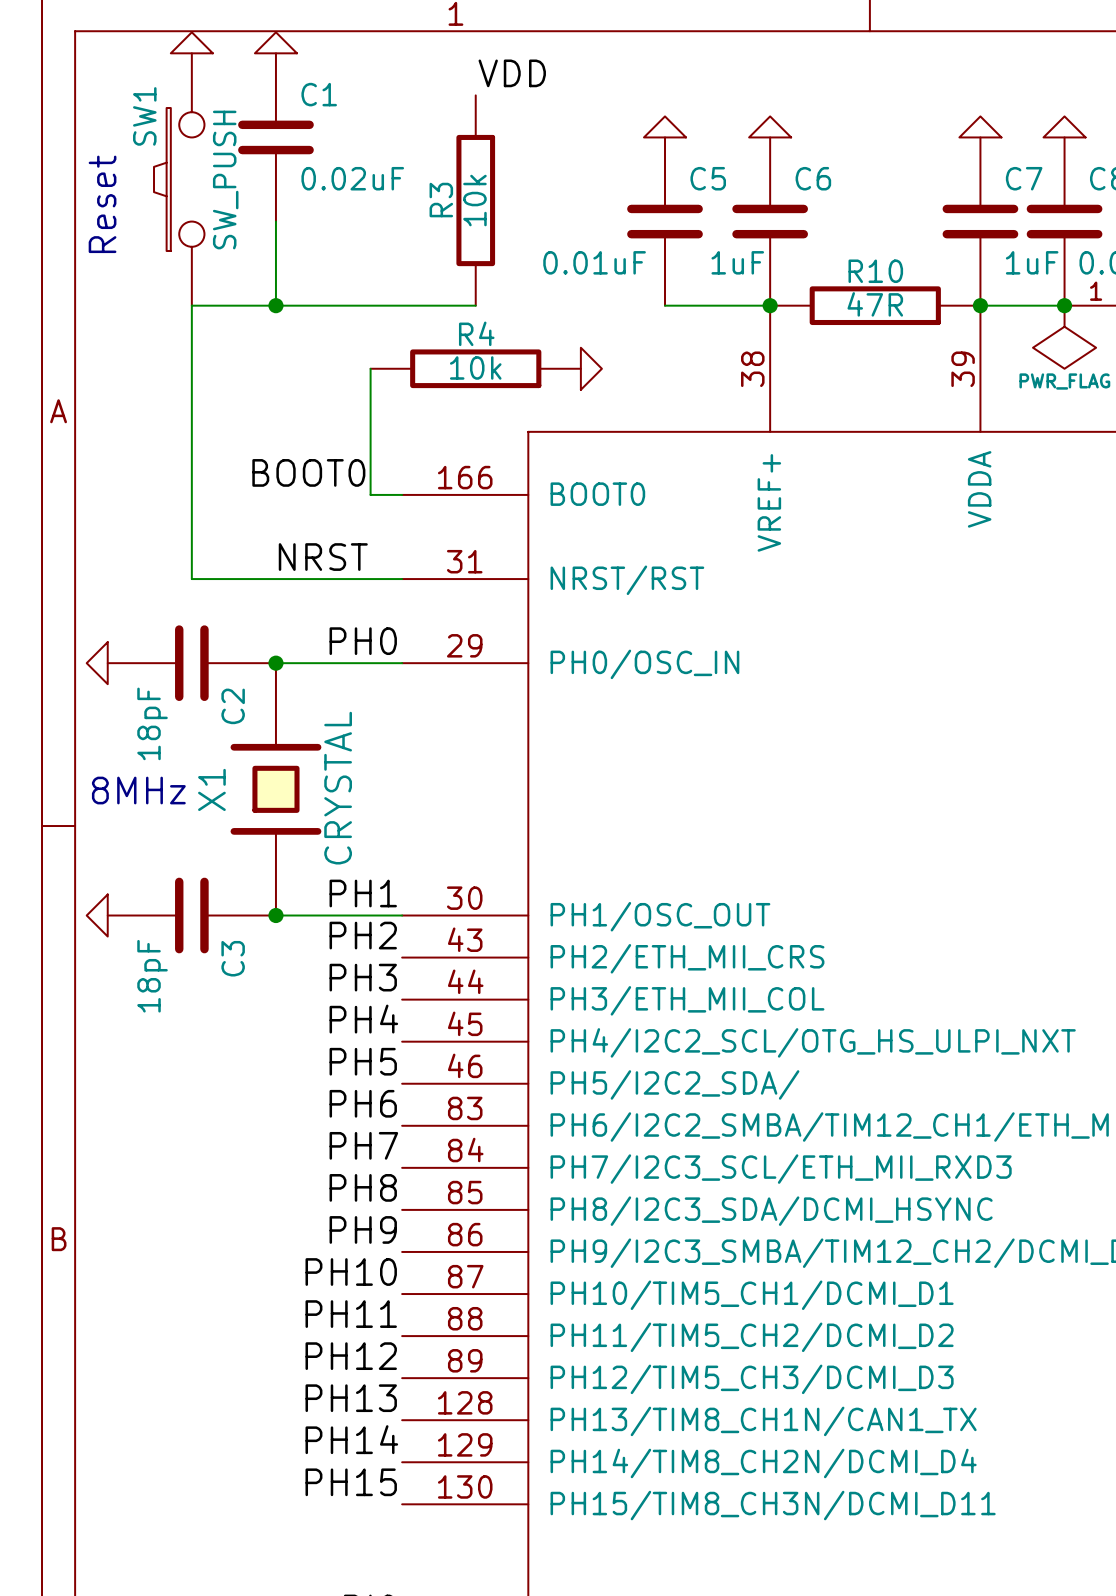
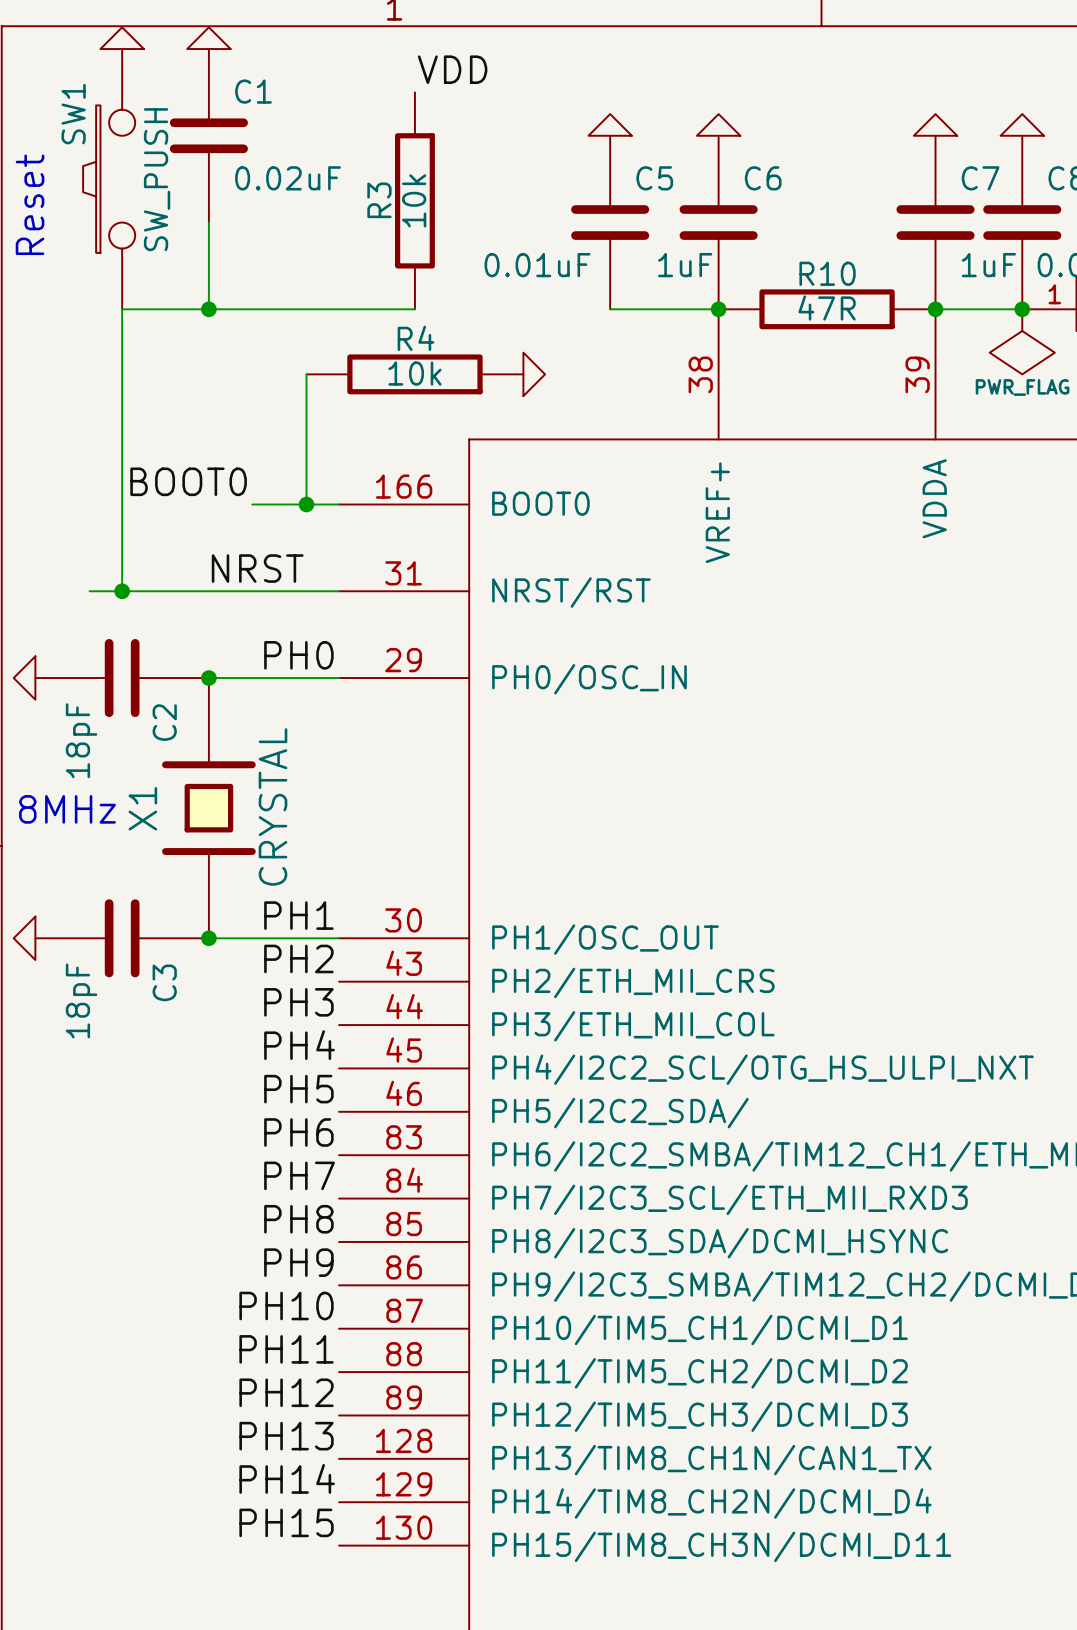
label position: BOOT0 (308, 472) -> BOOT0 (188, 481)
wire: none -> (252, 504) (306, 504)
junction: none -> (306, 504)
wire: none -> (89, 591) (122, 591)
junction: none -> (122, 591)

